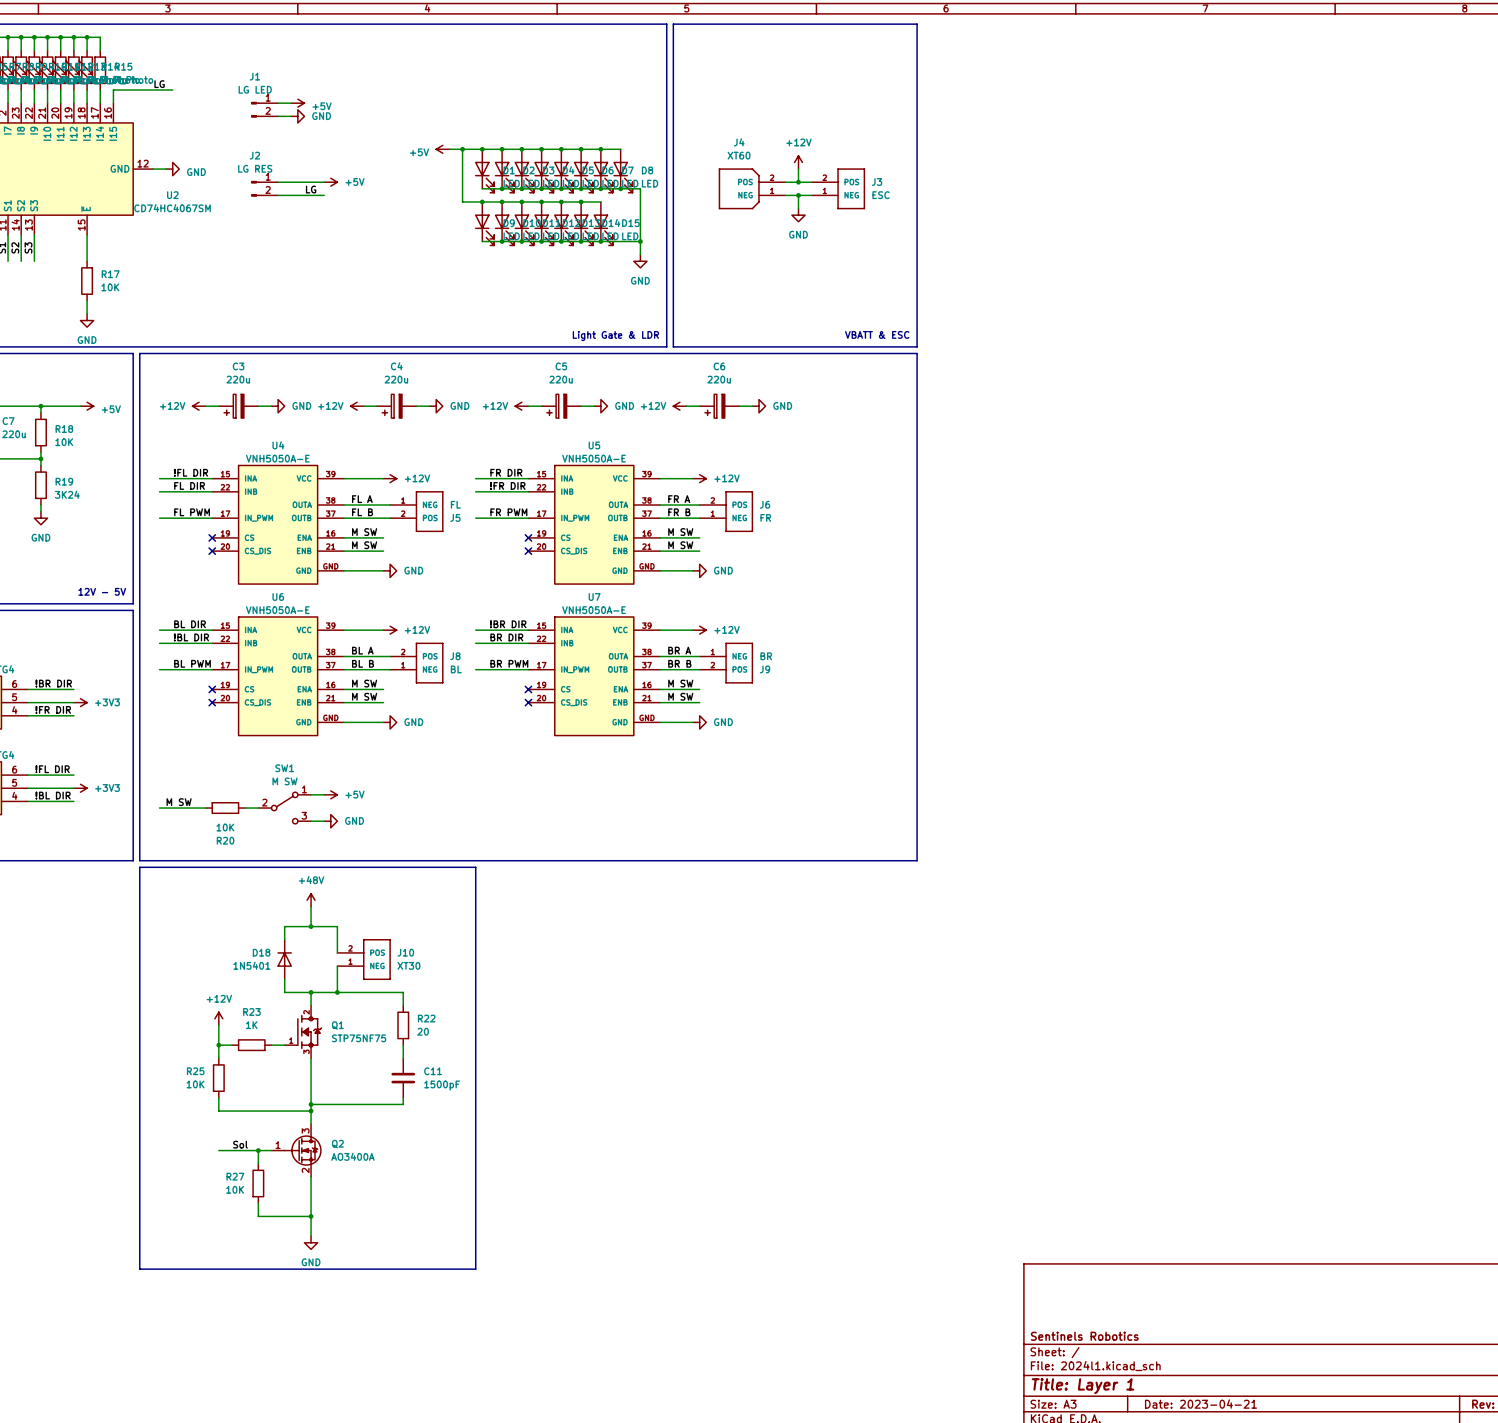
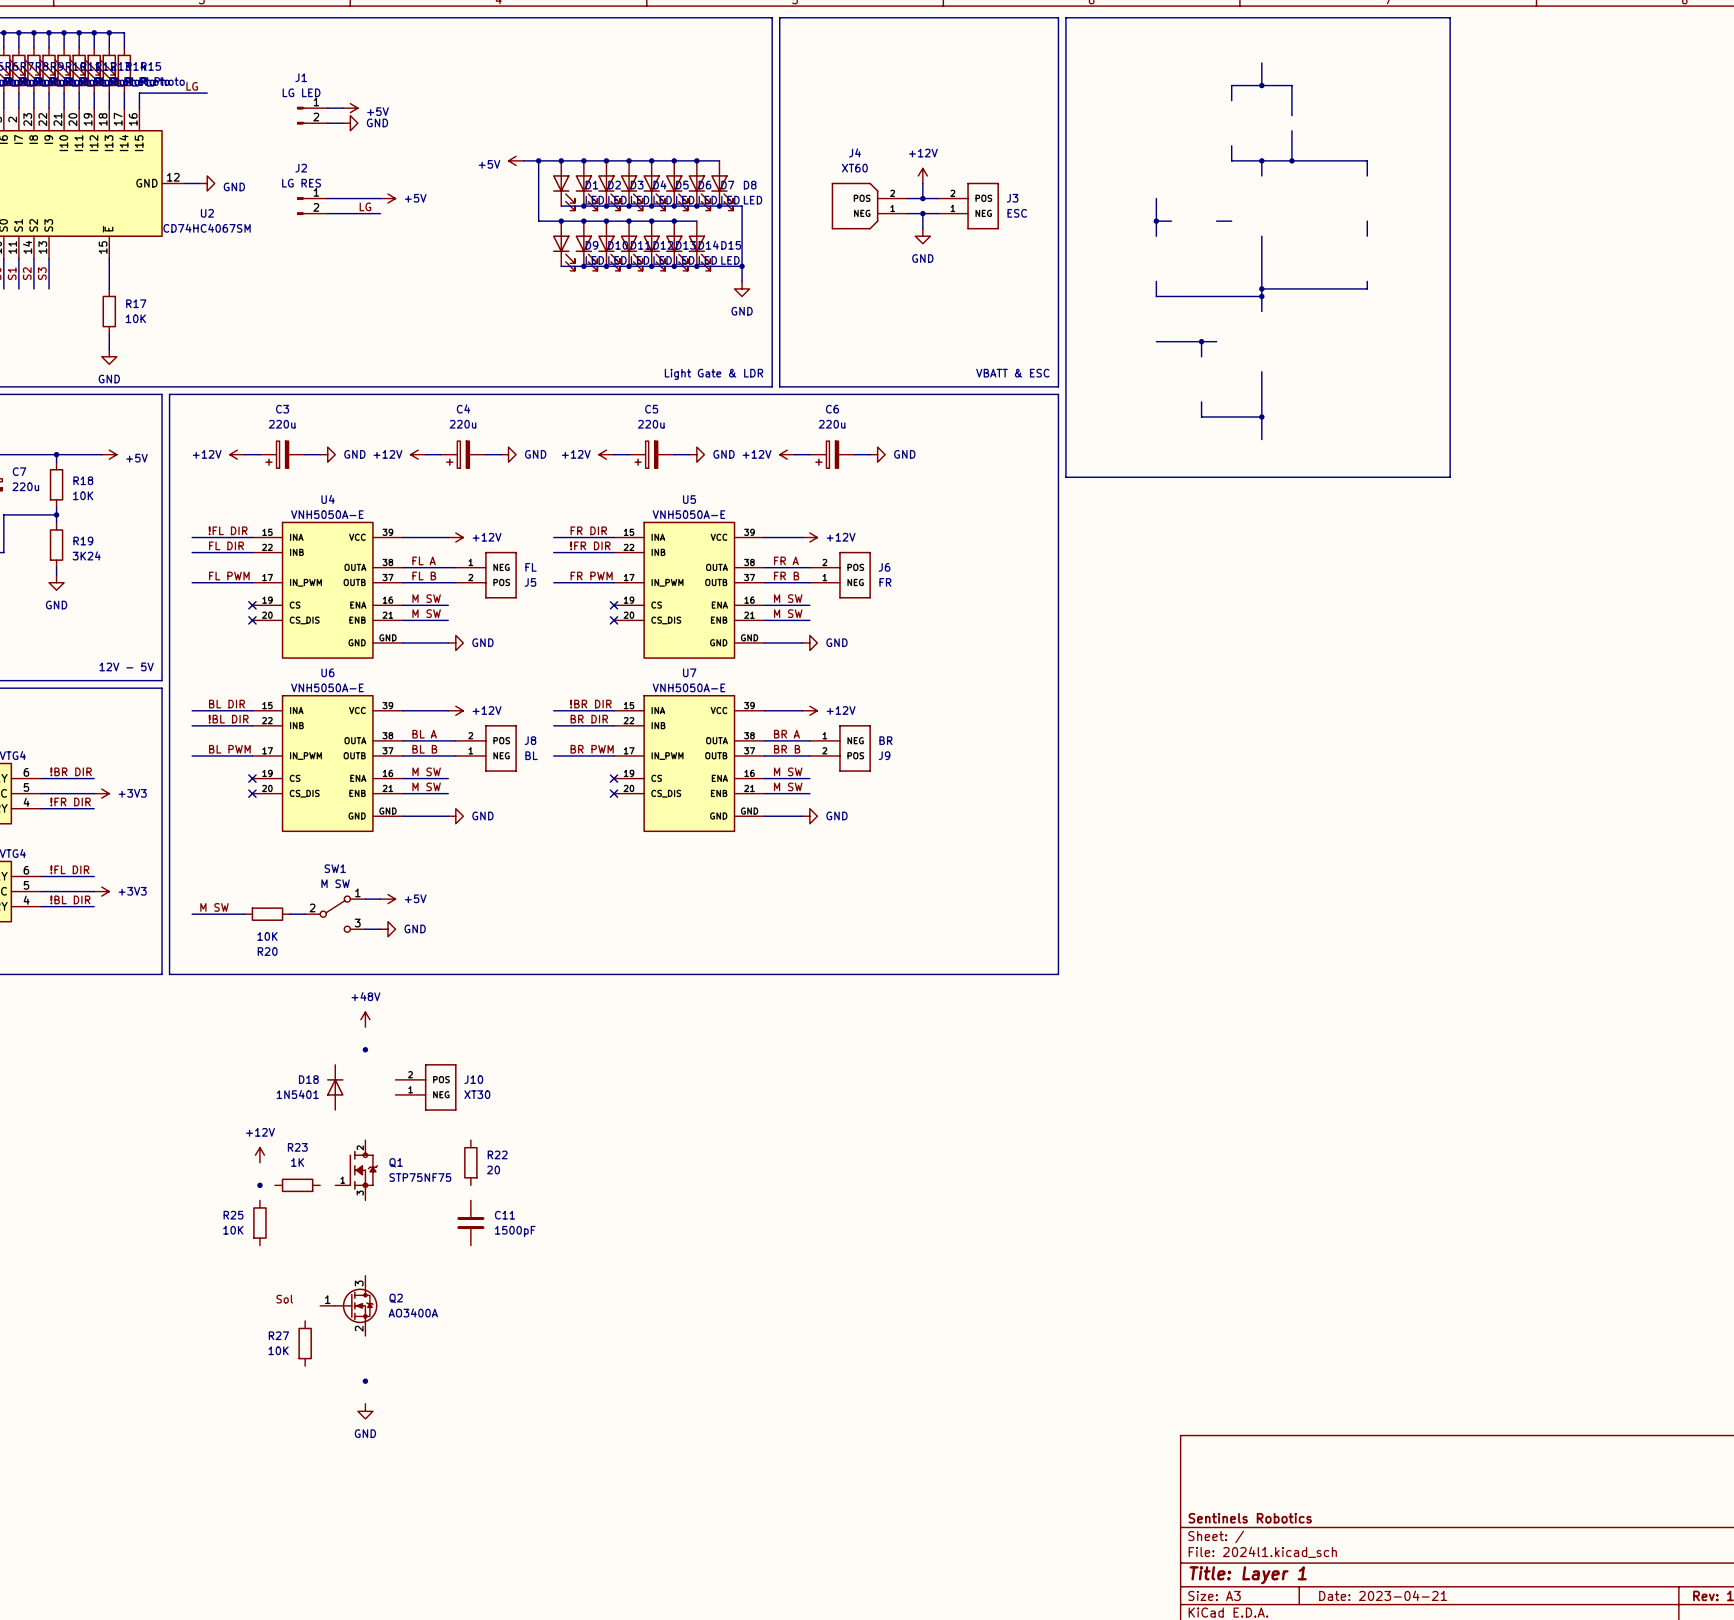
line: none -> (1065, 17) (1450, 17) (1450, 477) (1065, 477) (1065, 17)
wire: none -> (1261, 62) (1261, 85)
junction: none -> (1261, 85)
wire: none -> (1231, 100) (1231, 85) (1291, 85) (1291, 115)
wire: none -> (1291, 130) (1291, 160)
wire: none -> (1231, 145) (1231, 160) (1367, 160) (1367, 175)
wire: none -> (1261, 160) (1261, 175)
junction: none -> (1261, 160)
junction: none -> (1291, 160)
wire: none -> (1156, 198) (1156, 236)
wire: none -> (1156, 221) (1171, 221)
junction: none -> (1156, 221)
wire: none -> (1216, 221) (1231, 221)
wire: none -> (1367, 221) (1367, 236)
wire: none -> (1261, 236) (1261, 311)
wire: none -> (1156, 281) (1156, 296) (1261, 296)
wire: none -> (1367, 281) (1367, 288) (1261, 288)
junction: none -> (1261, 288)
junction: none -> (1261, 296)
wire: none -> (1156, 341) (1216, 341)
wire: none -> (1201, 341) (1201, 356)
junction: none -> (1201, 341)
wire: none -> (1261, 371) (1261, 439)
wire: none -> (1201, 401) (1201, 417) (1261, 417)
junction: none -> (1261, 417)
line: (139, 867) (139, 1269) (475, 1269) (475, 867) (139, 867) -> none
wire: (311, 906) (311, 926) -> none
wire: (284, 939) (284, 926) (337, 926) (337, 952) -> none
wire: (337, 966) (337, 992) -> none
wire: (284, 979) (284, 992) (403, 992) (403, 1005) -> none
wire: (311, 992) (311, 1005) -> none
junction: (311, 992) -> none
junction: (337, 992) -> none
wire: (218, 1025) (218, 1058) -> none
wire: (218, 1045) (231, 1045) -> none
wire: (271, 1045) (284, 1045) -> none
wire: (403, 1045) (403, 1058) -> none
wire: (311, 1058) (311, 1124) -> none
wire: (218, 1097) (218, 1111) (311, 1111) -> none
wire: (403, 1097) (403, 1104) (311, 1104) -> none
junction: (311, 1104) -> none
junction: (311, 1111) -> none
wire: (218, 1150) (271, 1150) -> none
wire: (258, 1150) (258, 1163) -> none
junction: (258, 1150) -> none
wire: (311, 1176) (311, 1236) -> none
wire: (258, 1203) (258, 1216) (311, 1216) -> none

